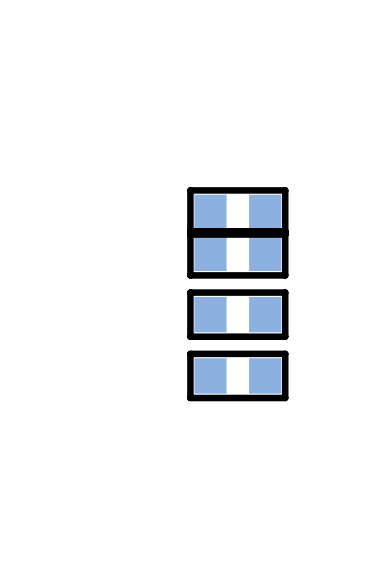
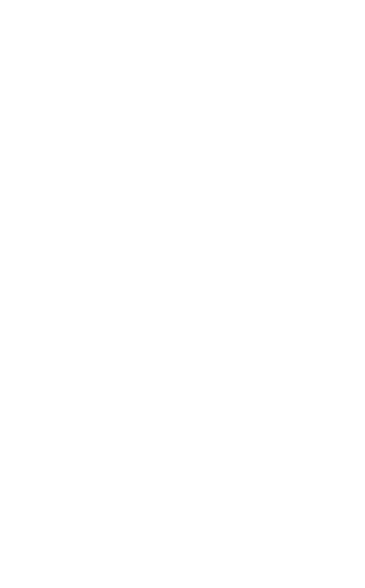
part: (237, 212) -> none
part: (237, 253) -> none
part: (237, 314) -> none
part: (237, 375) -> none

